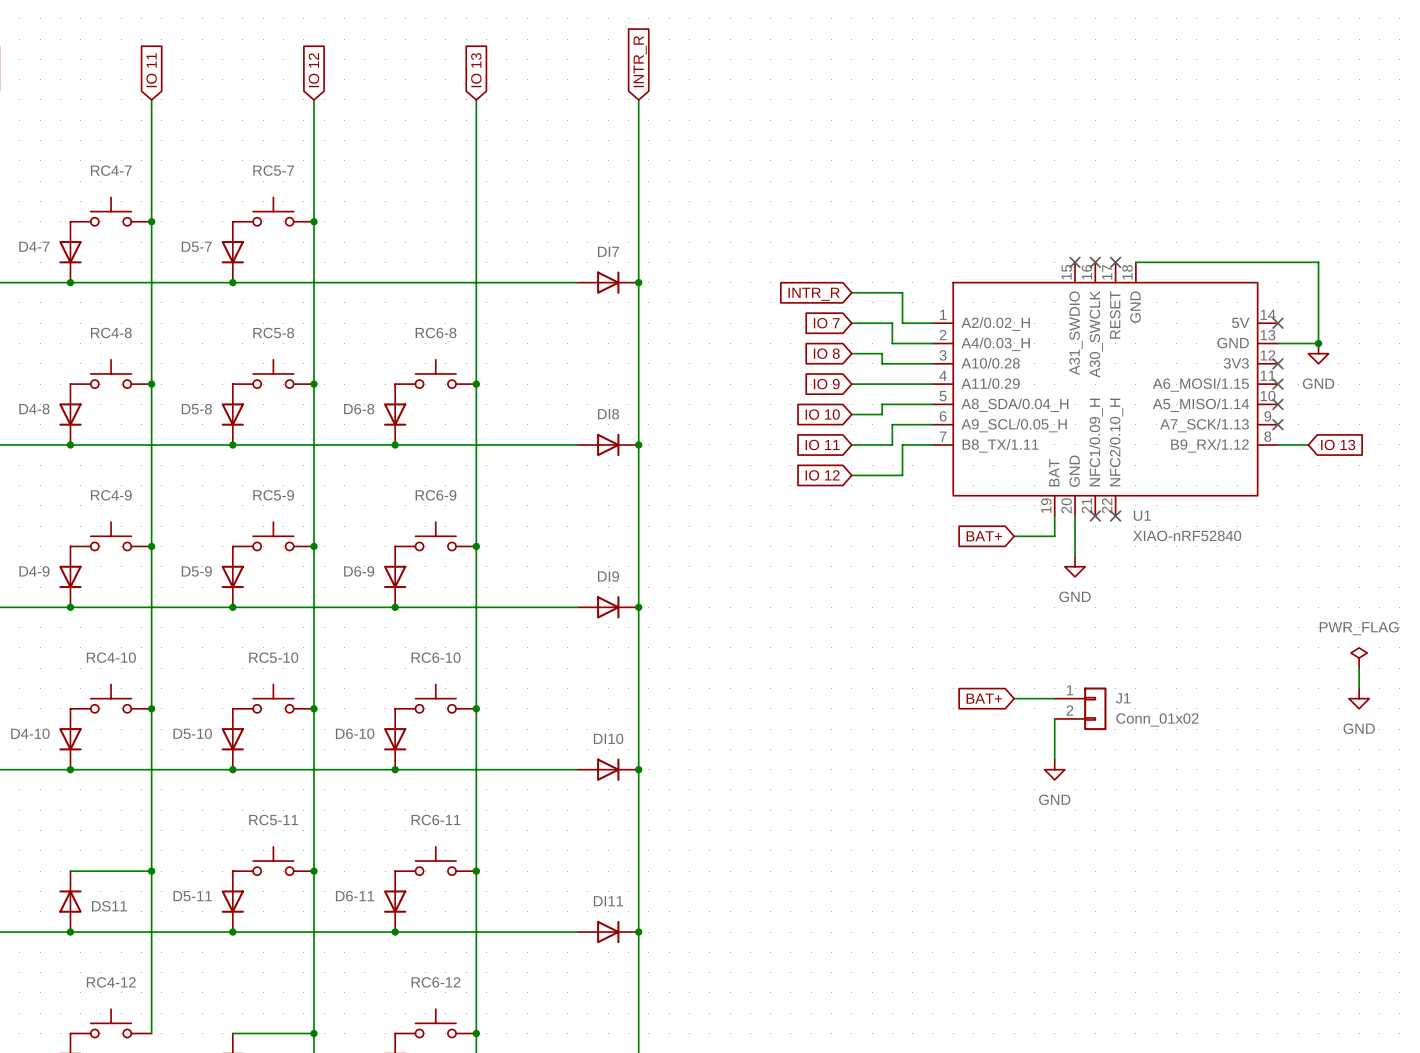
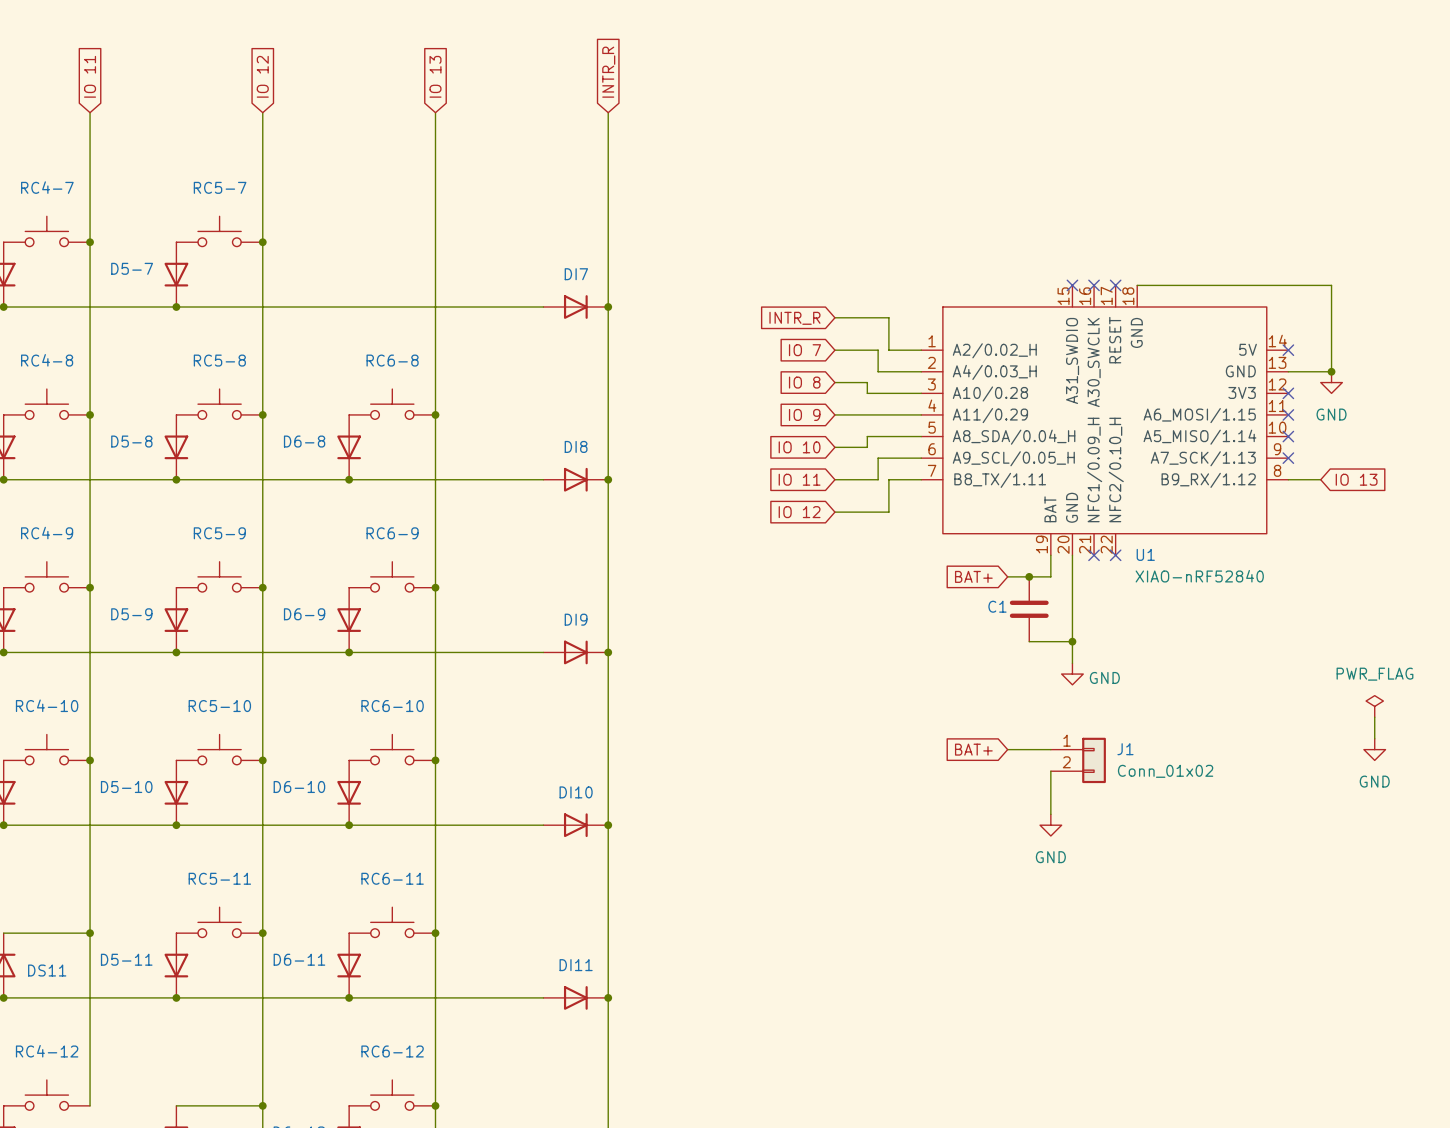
junction: none -> (1029, 576)
wire: none -> (1072, 598) (1072, 663)
C1: none -> (1029, 609)
power symbol position: GND (1075, 566) -> GND (1072, 674)
power symbol text position: GND (1075, 596) -> GND (1104, 677)
wire: none -> (1029, 641) (1072, 641)
junction: none -> (1072, 641)

